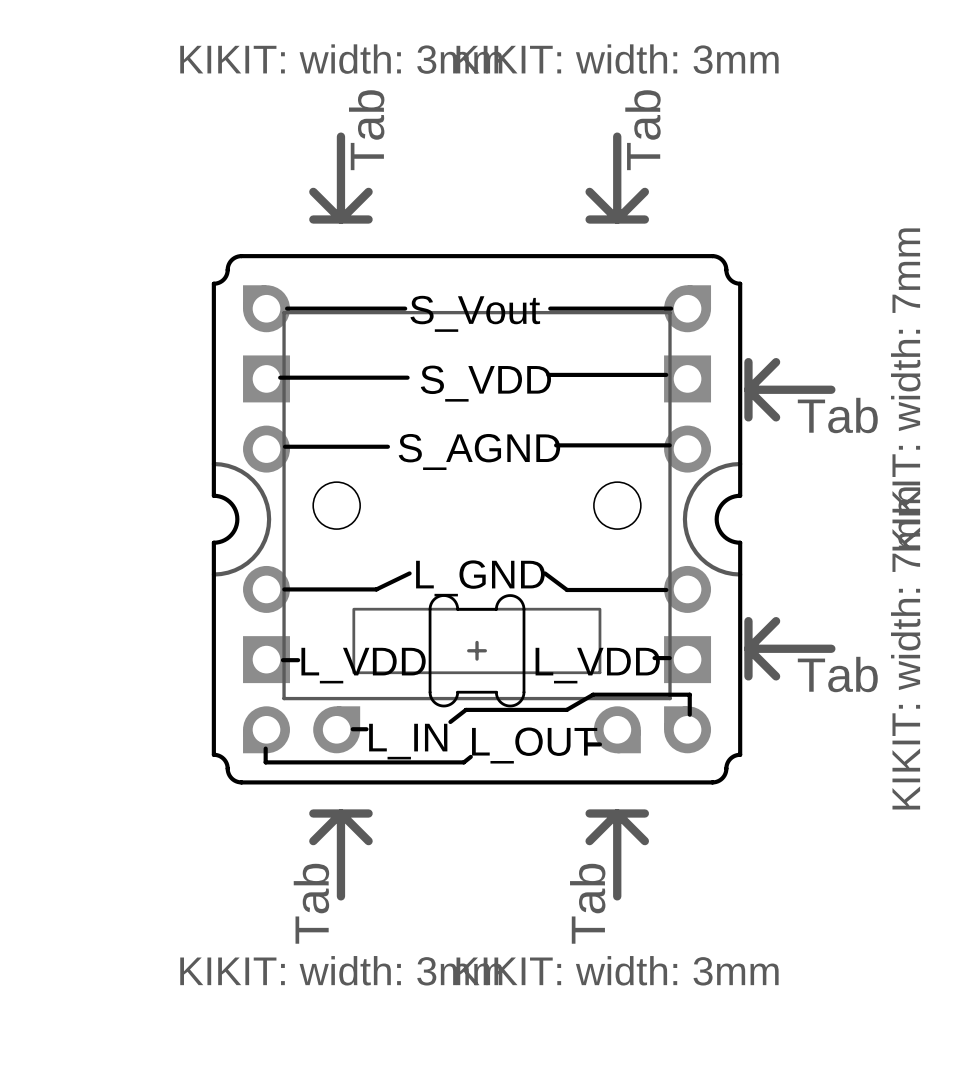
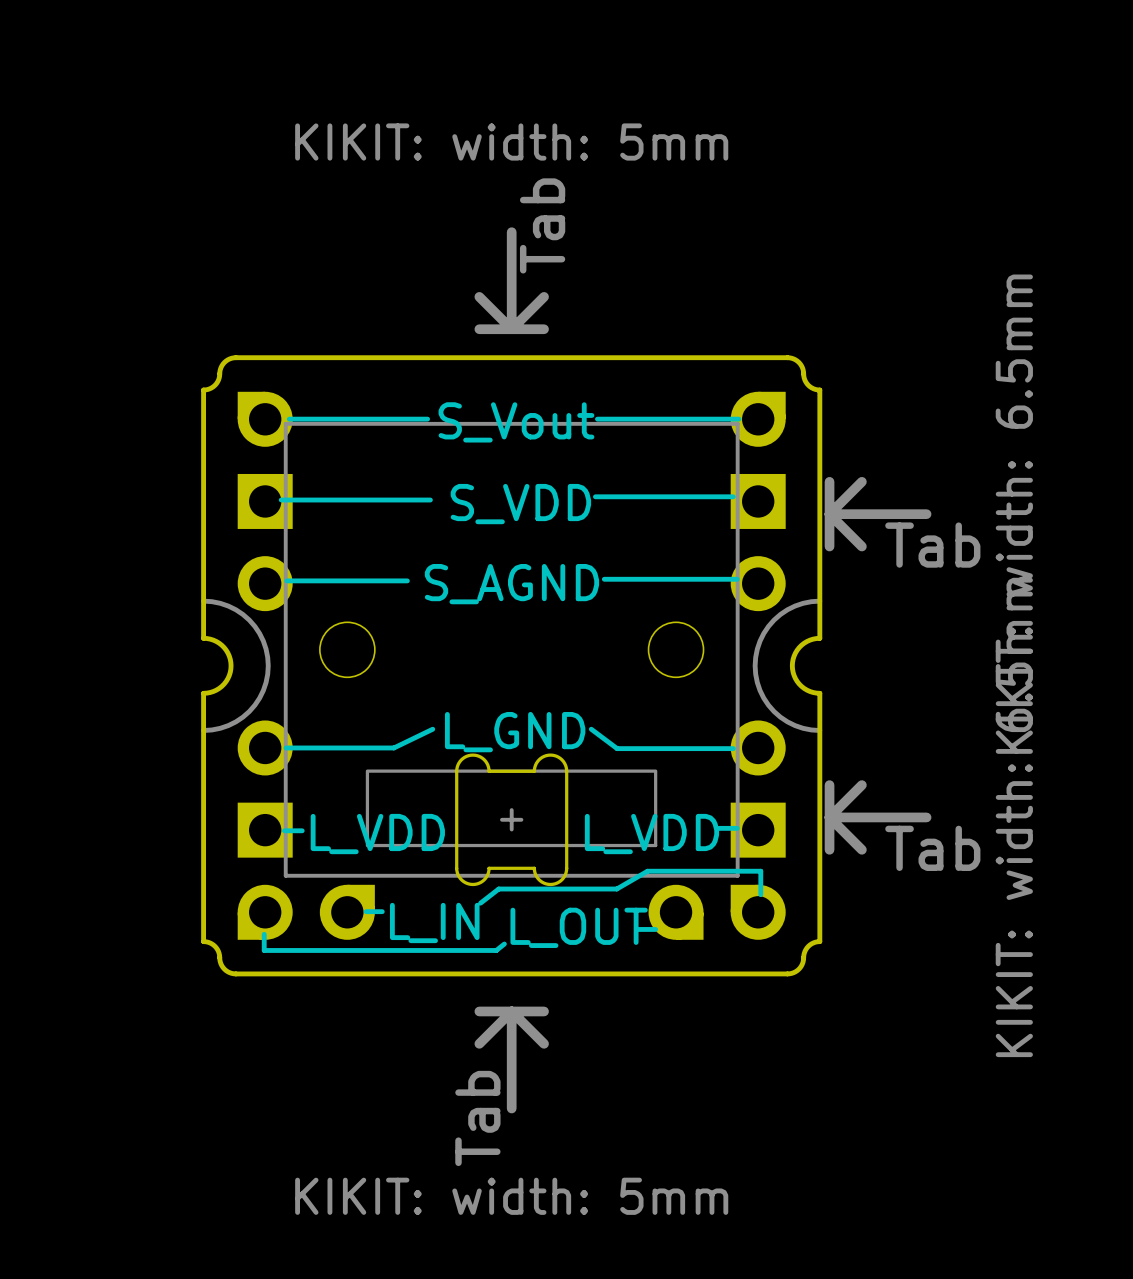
drawing: [309, 132, 650, 224] -> none
drawing: none -> [474, 227, 549, 335]
drawing shape: [744, 228, 921, 551] -> [824, 274, 1033, 754]
drawing shape: [744, 487, 921, 810] -> [824, 577, 1033, 1058]
drawing: [309, 809, 650, 901] -> none
drawing: none -> [474, 1006, 549, 1114]

